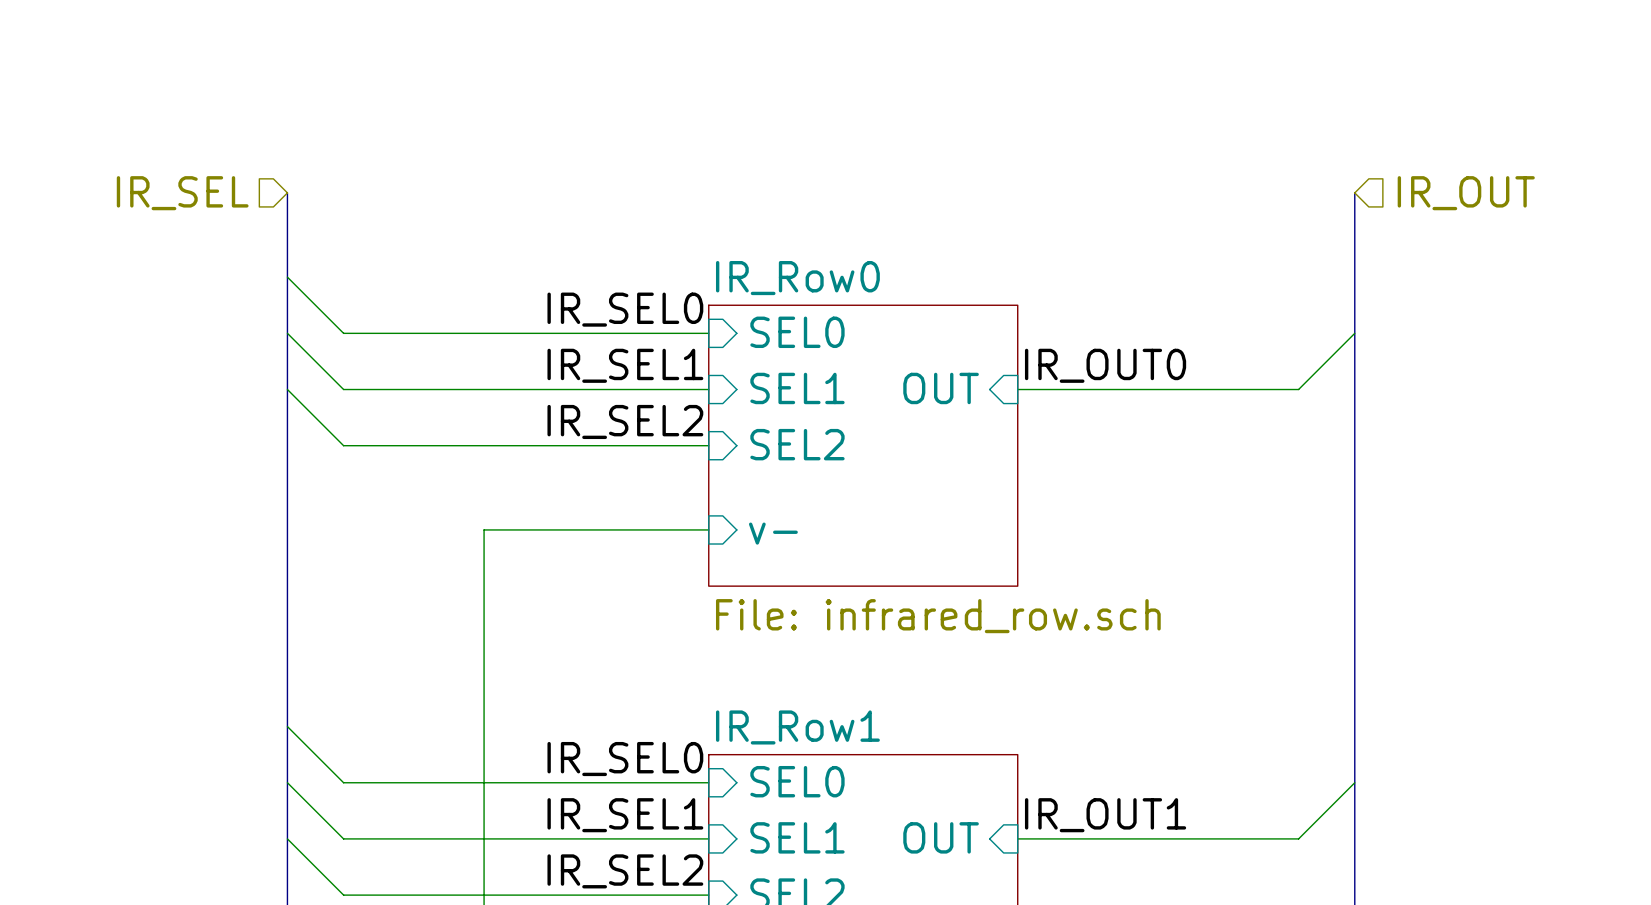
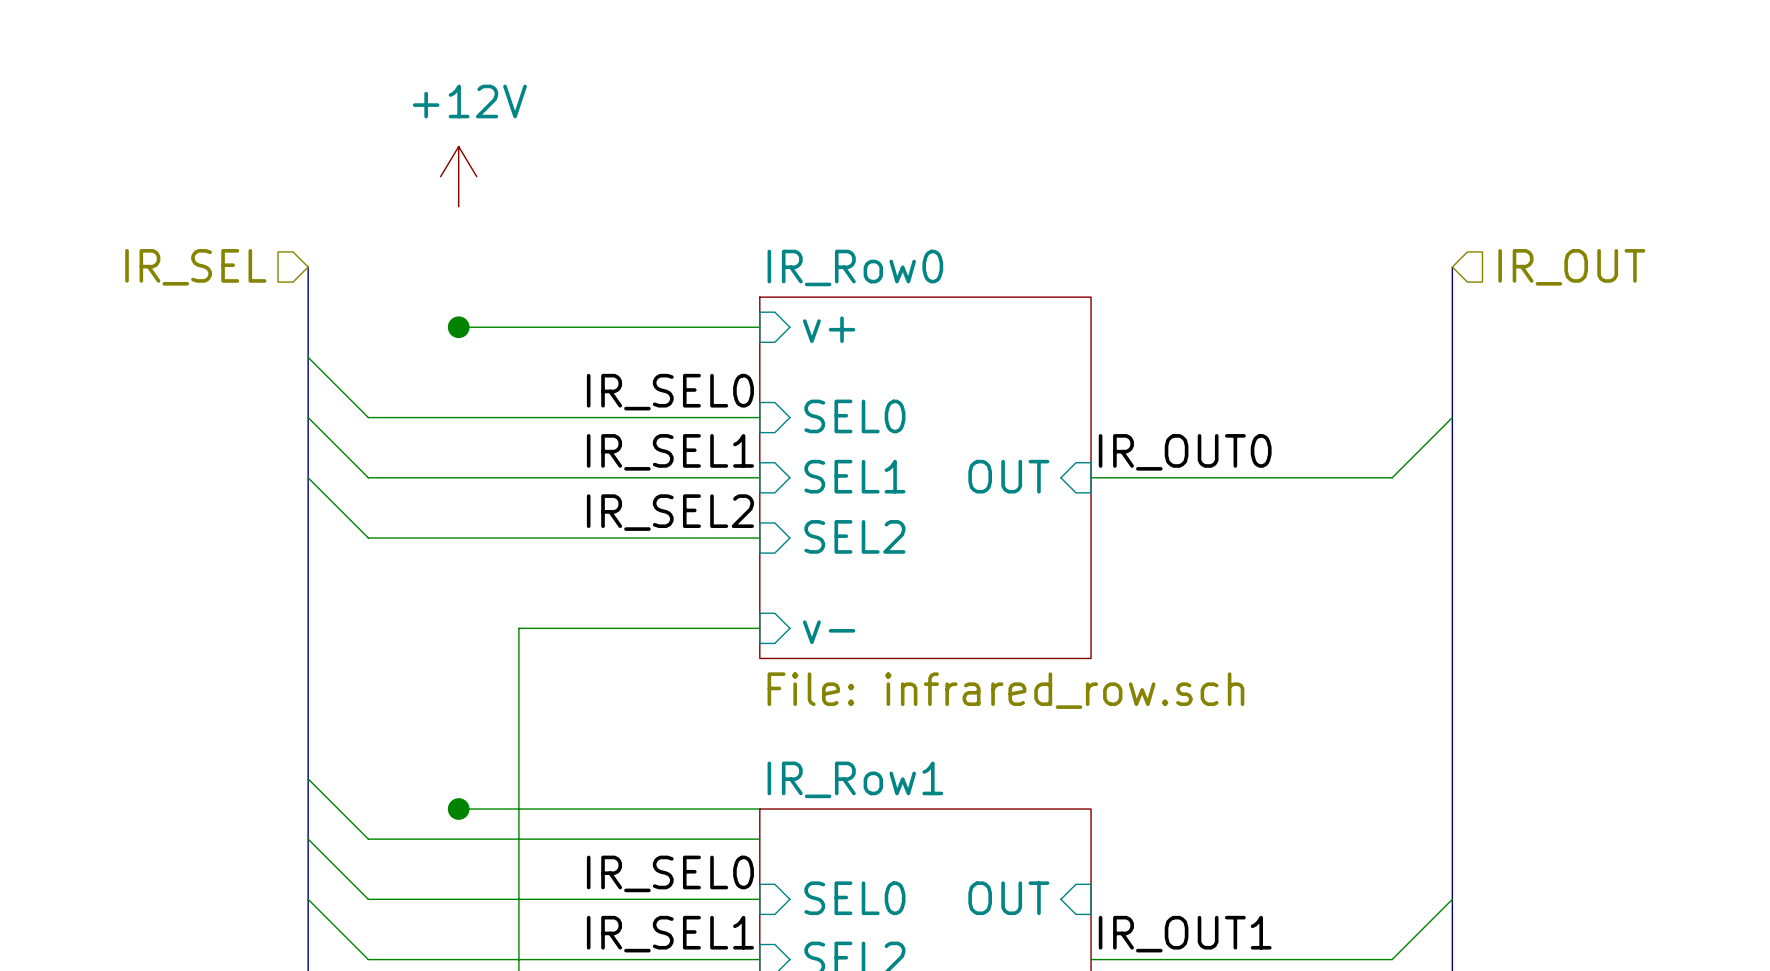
power symbol: none -> +12V (458, 176)
bus: (287, 192) (287, 249) -> none
bus: (1354, 192) (1354, 249) -> none
hierarchical label position: IR_SEL (182, 193) -> IR_SEL (195, 267)
hierarchical label position: IR_OUT (1466, 193) -> IR_OUT (1571, 267)
wire: (287, 277) (343, 333) (708, 333) -> (308, 477) (368, 538) (759, 538)
wire: none -> (458, 327) (759, 327)
junction: none -> (458, 327)
sheet IR_Row0 shape: [708, 305, 1018, 587] -> [759, 297, 1092, 659]
sheet pin: none -> v+ (829, 329)
label: IR_SEL0 (625, 309) -> none
sheet pin: SEL0 (797, 332) -> none
wire: (1354, 333) (1298, 389) (1017, 389) -> (1452, 417) (1392, 477) (1091, 477)
label: IR_SEL1 (625, 365) -> IR_SEL0 (670, 392)
label position: IR_OUT0 (1105, 365) -> IR_OUT0 (1185, 452)
sheet pin: SEL1 (797, 388) -> SEL0 (854, 416)
sheet pin position: OUT (941, 388) -> OUT (1008, 476)
label: IR_SEL2 (625, 421) -> IR_SEL1 (670, 452)
sheet pin: SEL2 (797, 444) -> SEL1 (854, 476)
label: none -> IR_SEL2 (670, 512)
sheet pin: none -> SEL2 (854, 536)
wire: (708, 529) (484, 529) (484, 586) -> (759, 628) (518, 628)
sheet pin position: v- (773, 533) -> v- (829, 632)
wire: none -> (458, 809) (759, 809)
junction: none -> (458, 809)
label: IR_SEL0 (625, 759) -> none
sheet pin: SEL0 (797, 781) -> none
wire: (1354, 782) (1298, 838) (1017, 838) -> (1452, 899) (1392, 959) (1091, 959)
label: IR_SEL1 (625, 815) -> IR_SEL0 (670, 873)
label position: IR_OUT1 (1105, 815) -> IR_OUT1 (1185, 934)
sheet pin: SEL1 (797, 837) -> SEL0 (854, 898)
label: IR_SEL2 (625, 871) -> IR_SEL1 (670, 934)

